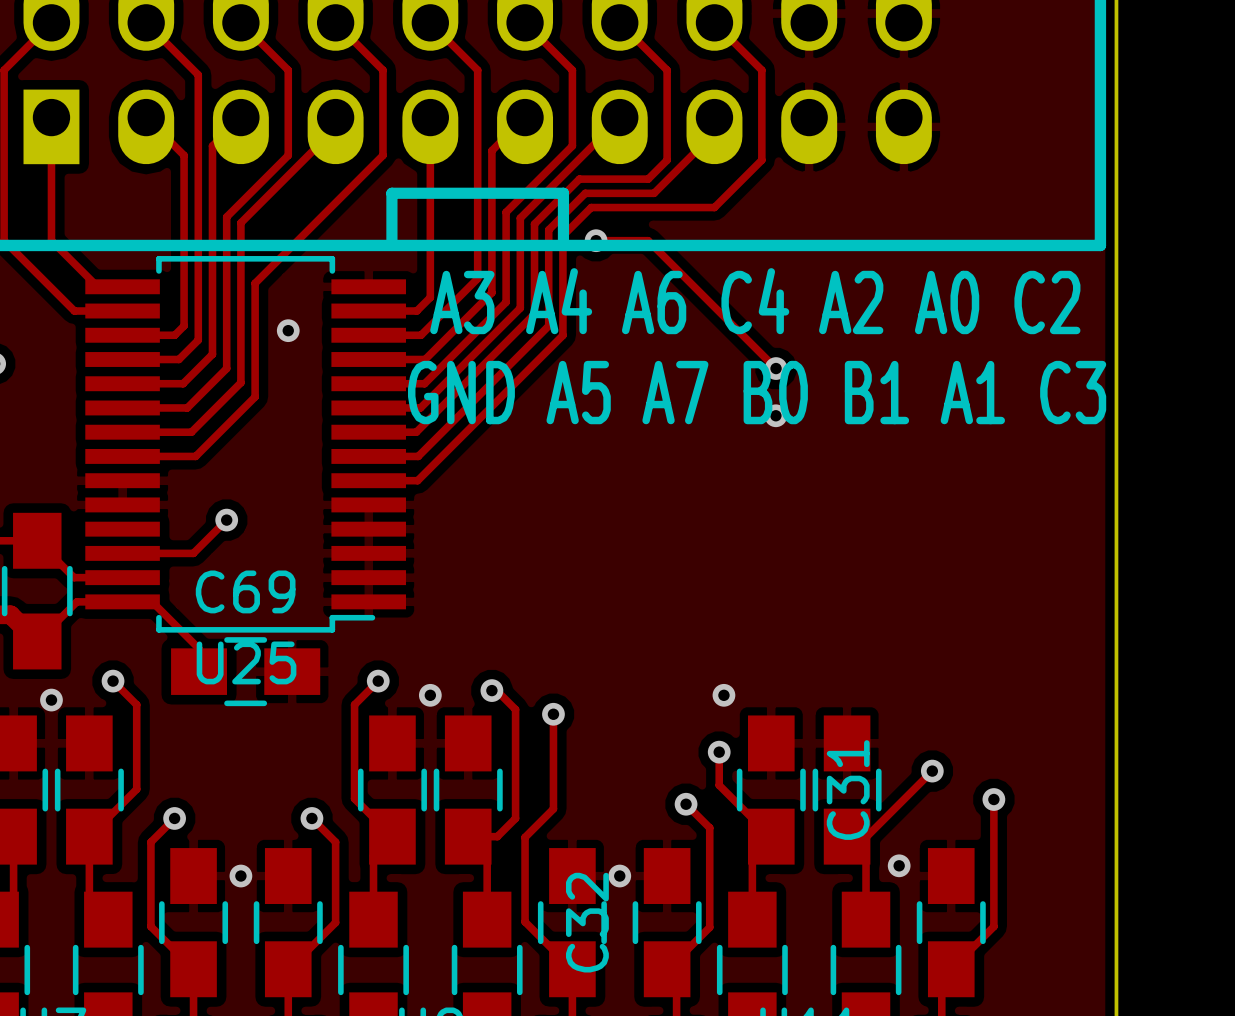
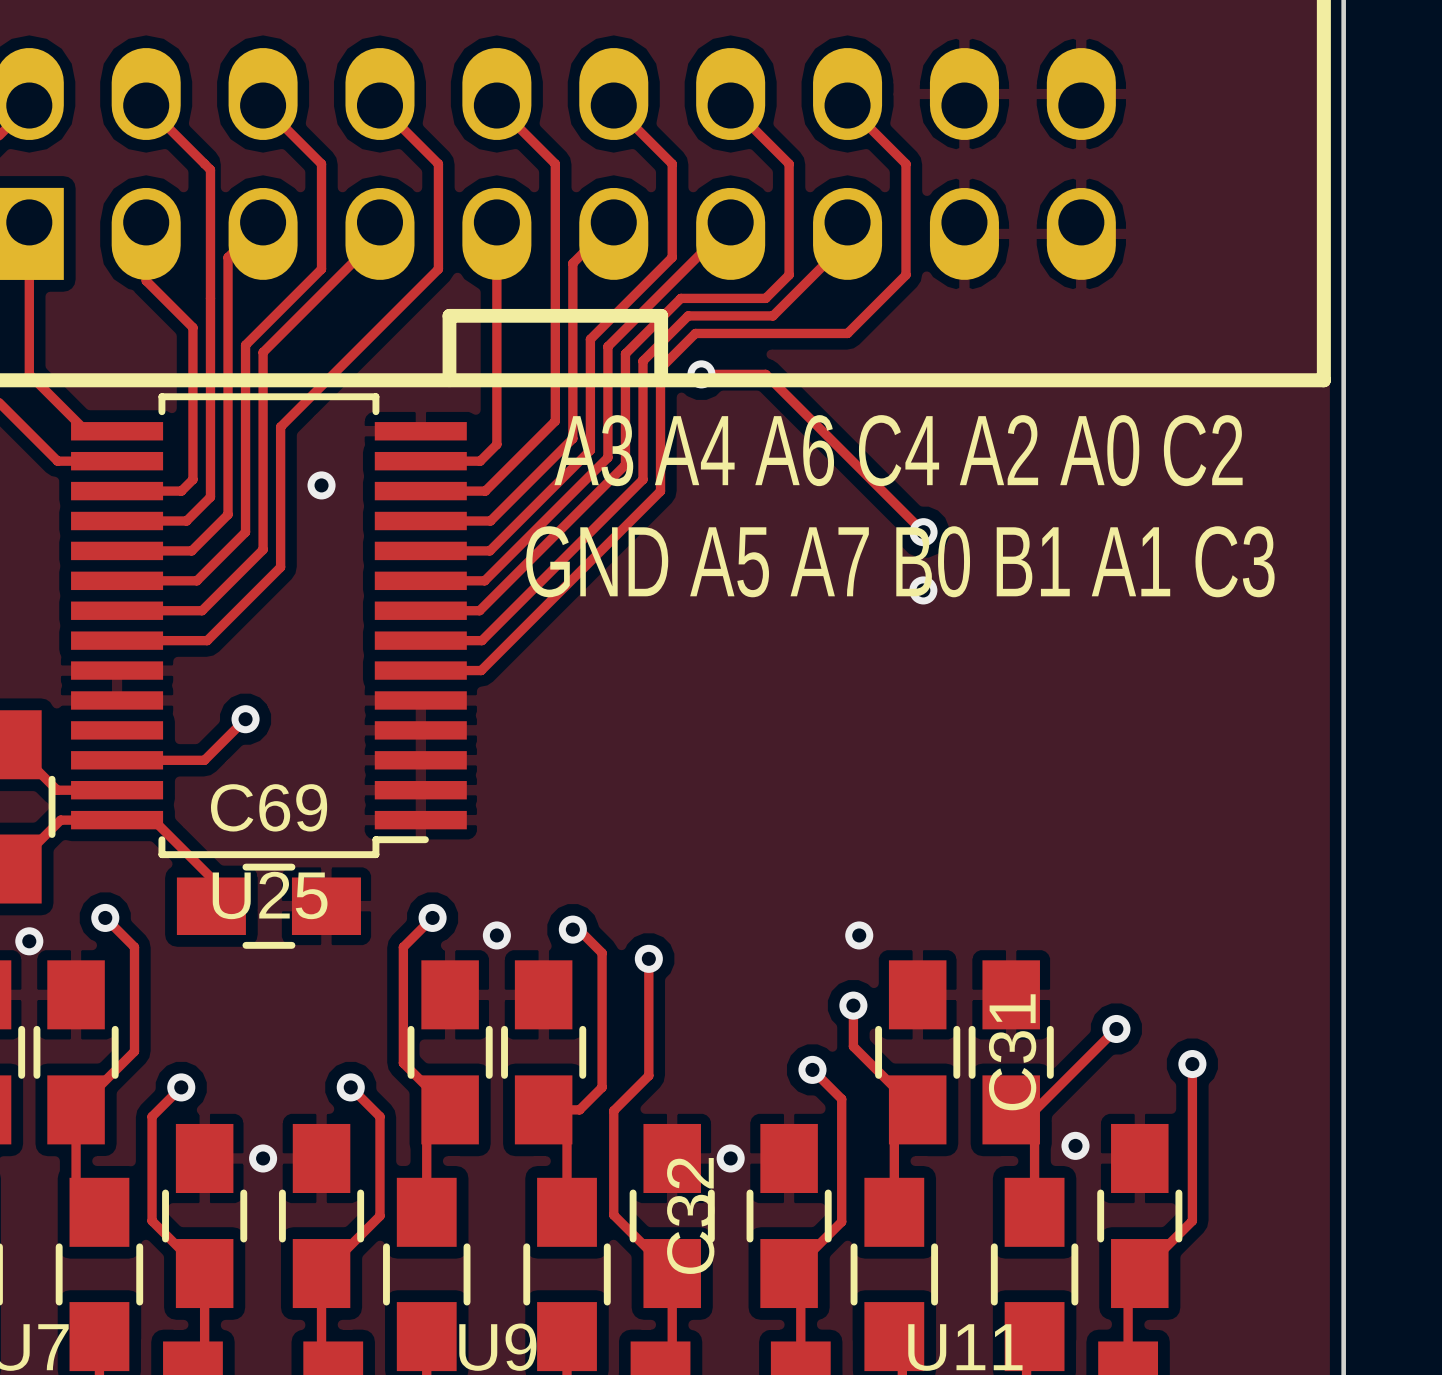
track: (146, 117) (184, 155) (184, 202) -> (146, 222) (146, 280) (192, 327)

